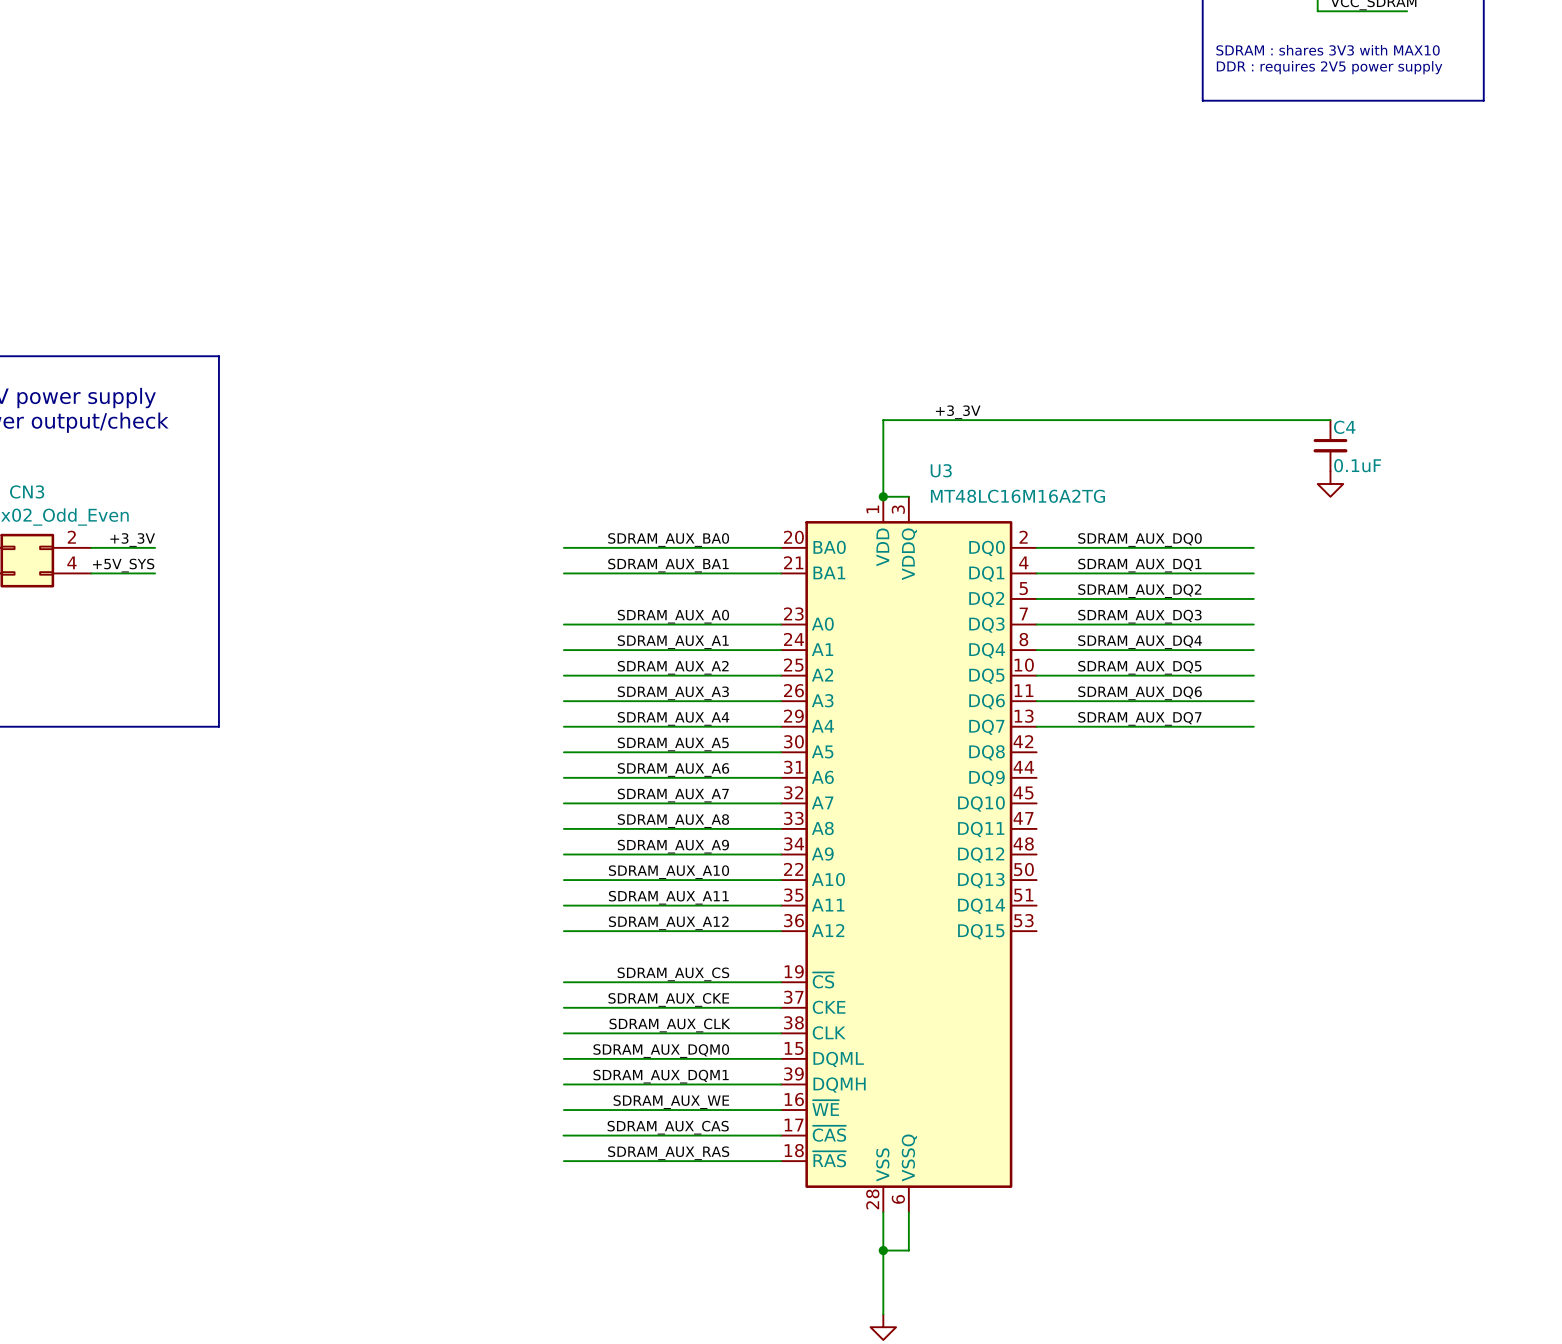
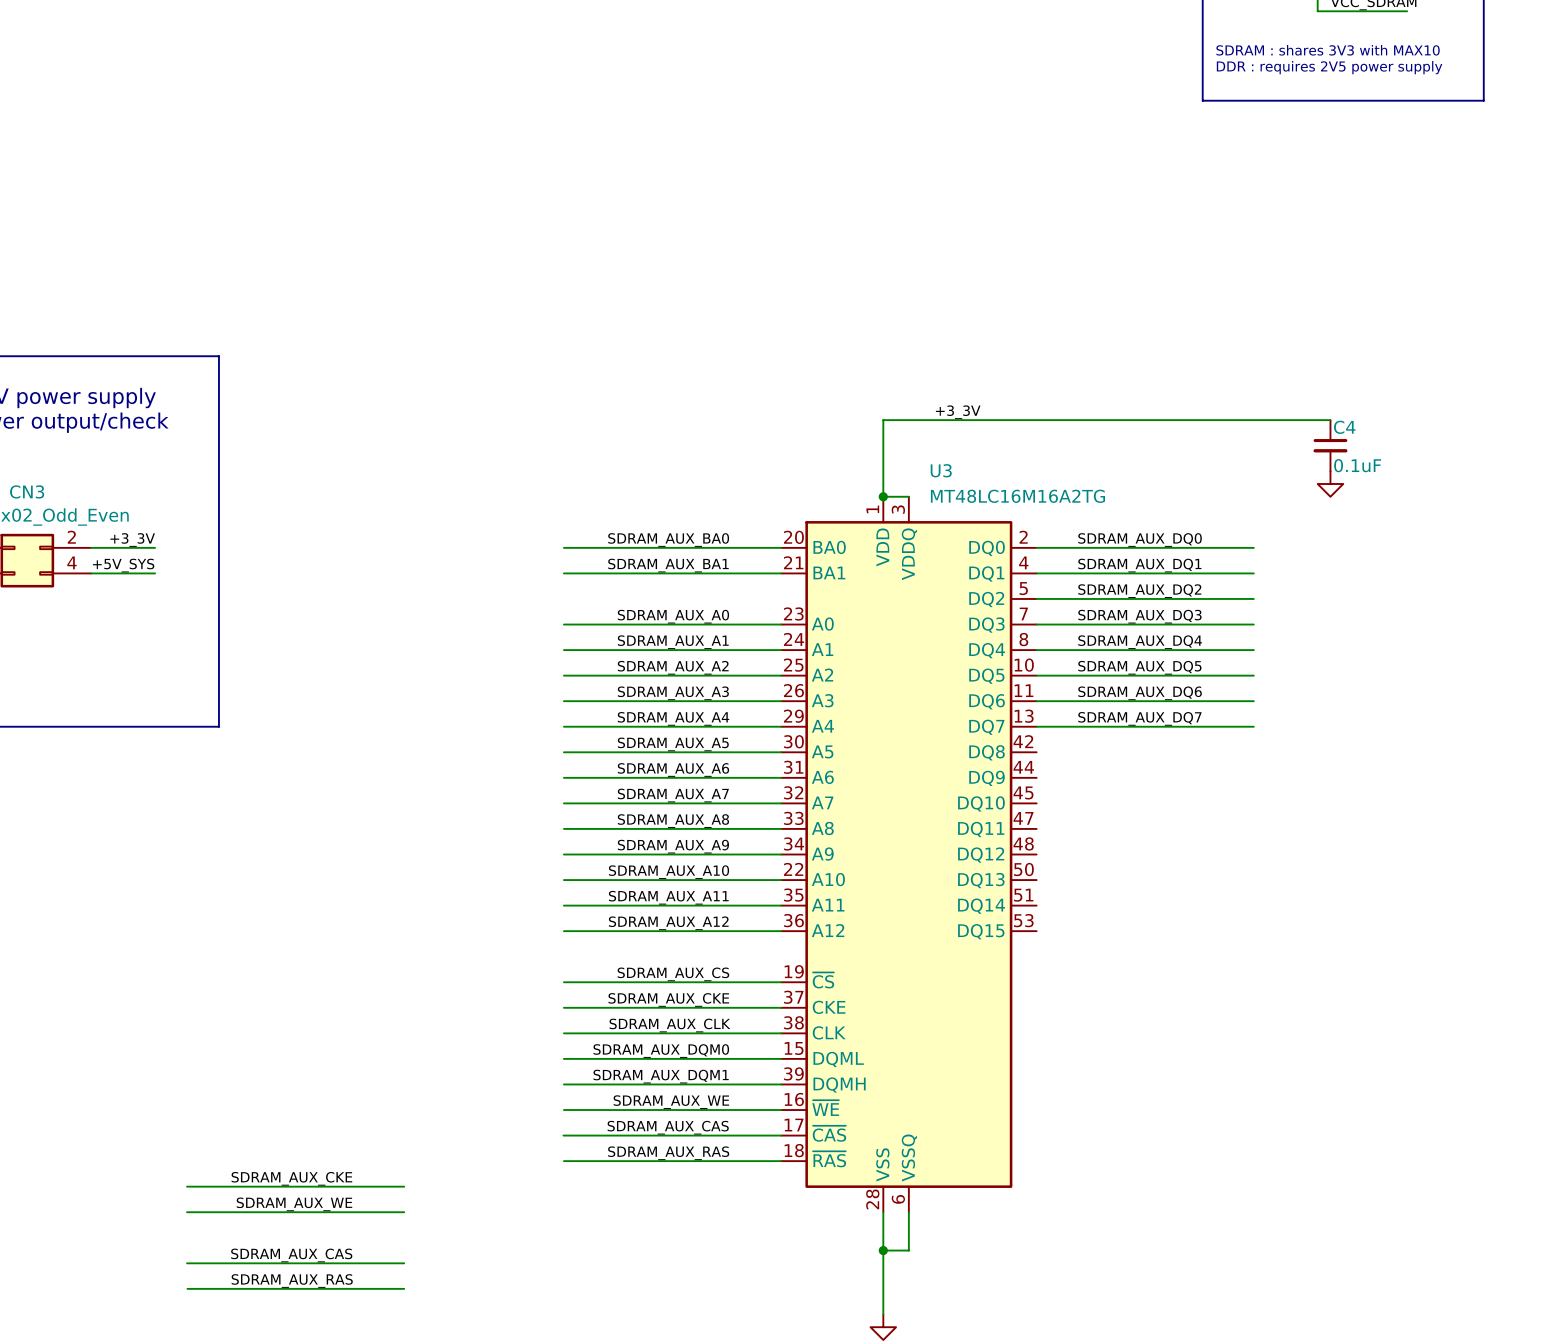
label: none -> SDRAM_AUX_CKE (291, 1178)
wire: none -> (187, 1186) (404, 1186)
label: none -> SDRAM_AUX_WE (294, 1204)
wire: none -> (187, 1212) (404, 1212)
label: none -> SDRAM_AUX_CAS (291, 1255)
wire: none -> (187, 1263) (404, 1263)
label: none -> SDRAM_AUX_RAS (292, 1281)
wire: none -> (187, 1288) (404, 1288)

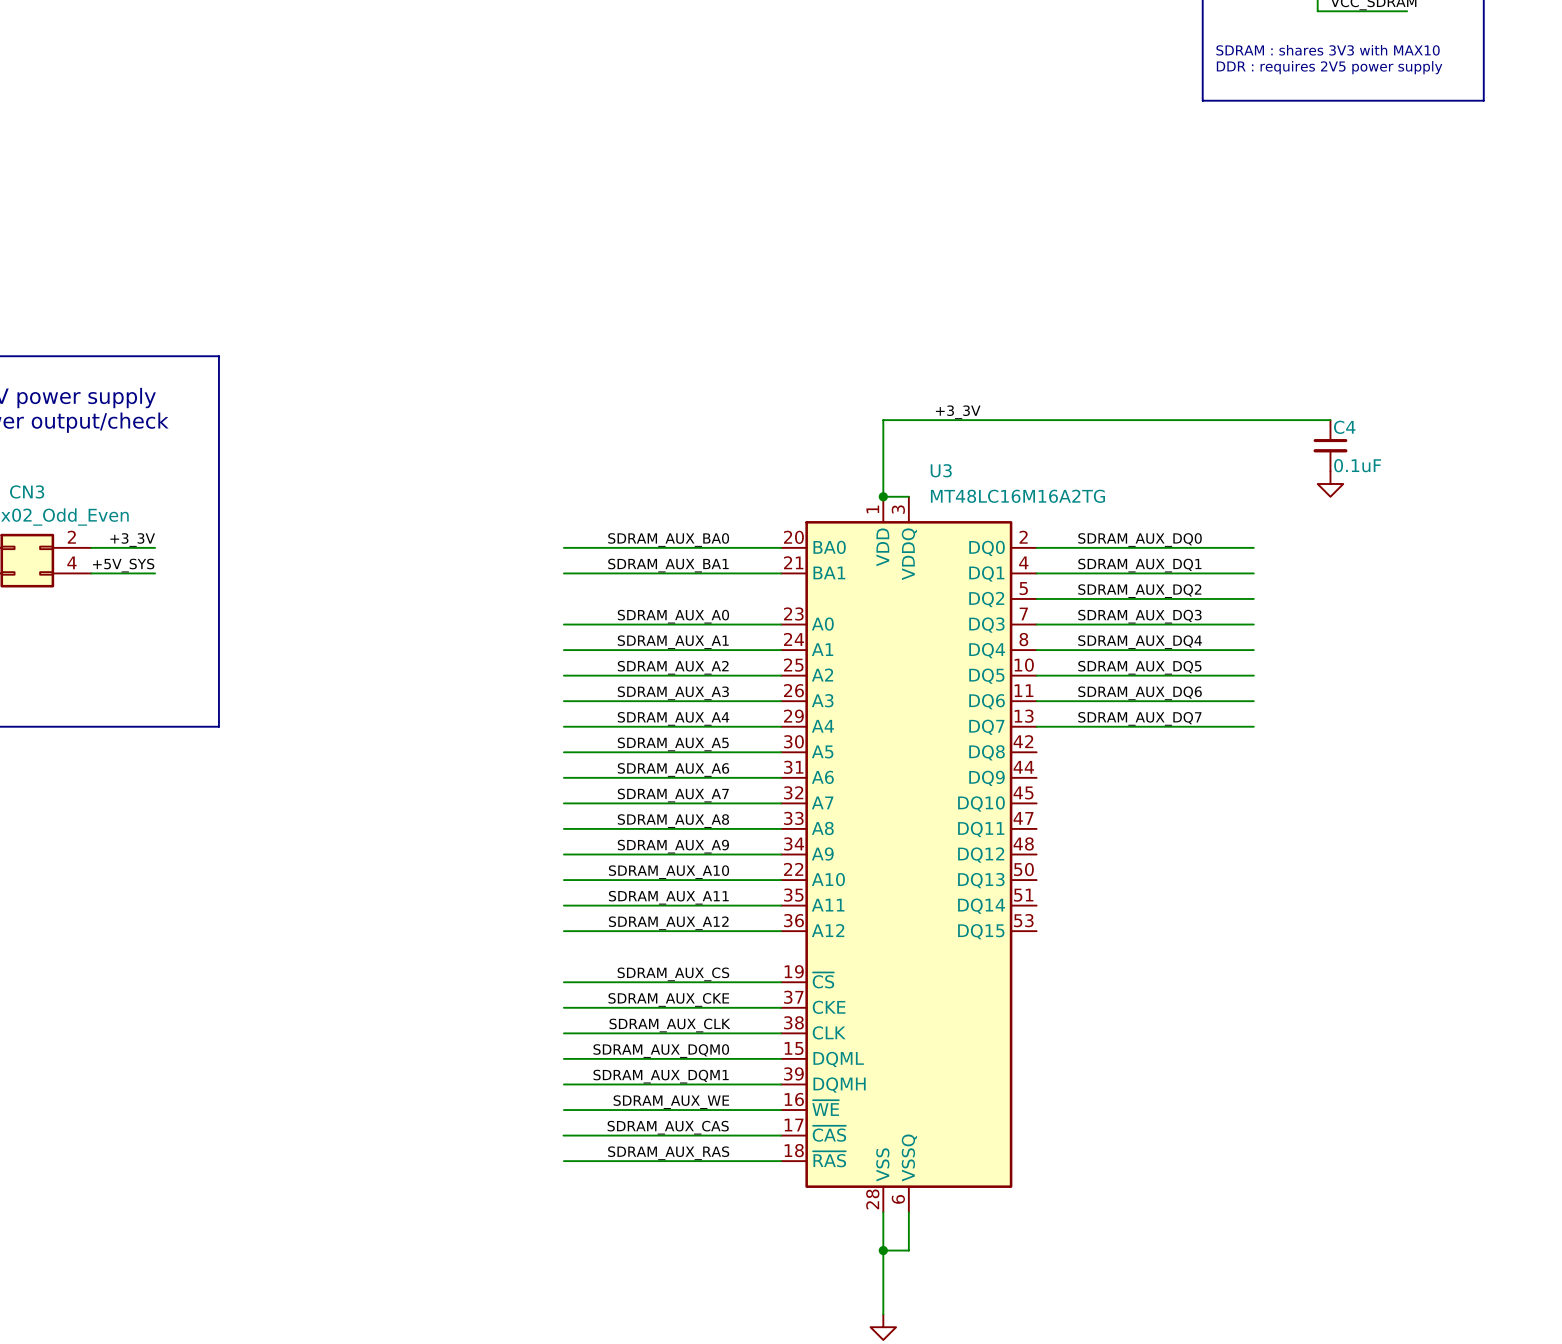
label: SDRAM_AUX_CKE (291, 1178) -> none
wire: (187, 1186) (404, 1186) -> none
label: SDRAM_AUX_WE (294, 1204) -> none
wire: (187, 1212) (404, 1212) -> none
label: SDRAM_AUX_CAS (291, 1255) -> none
wire: (187, 1263) (404, 1263) -> none
label: SDRAM_AUX_RAS (292, 1281) -> none
wire: (187, 1288) (404, 1288) -> none

